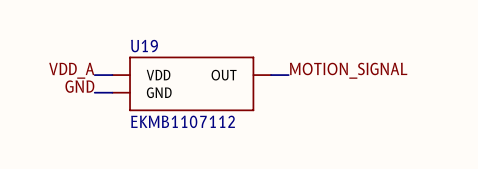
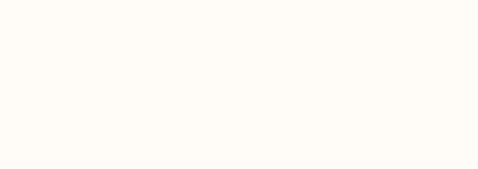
label: VDD_A (71, 70) -> none
label: MOTION_SIGNAL (348, 70) -> none
wire: (94, 75) (112, 75) -> none
wire: (271, 75) (288, 75) -> none
U19: (191, 83) -> none
label: GND (79, 86) -> none
wire: (94, 92) (112, 92) -> none

